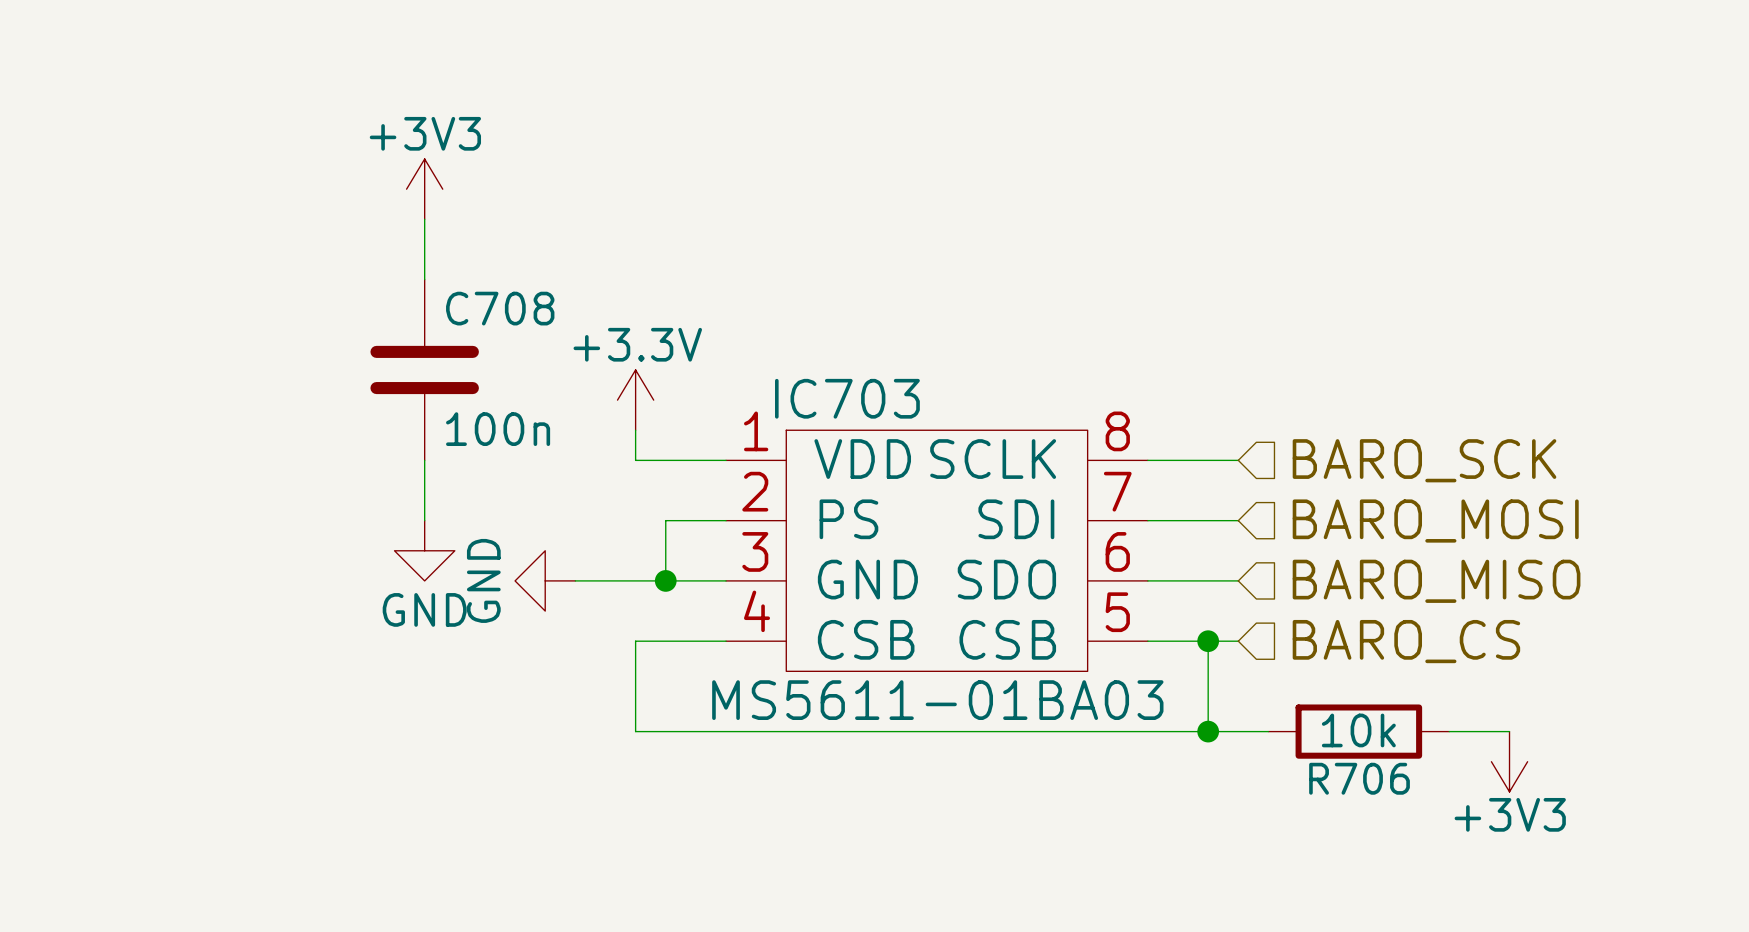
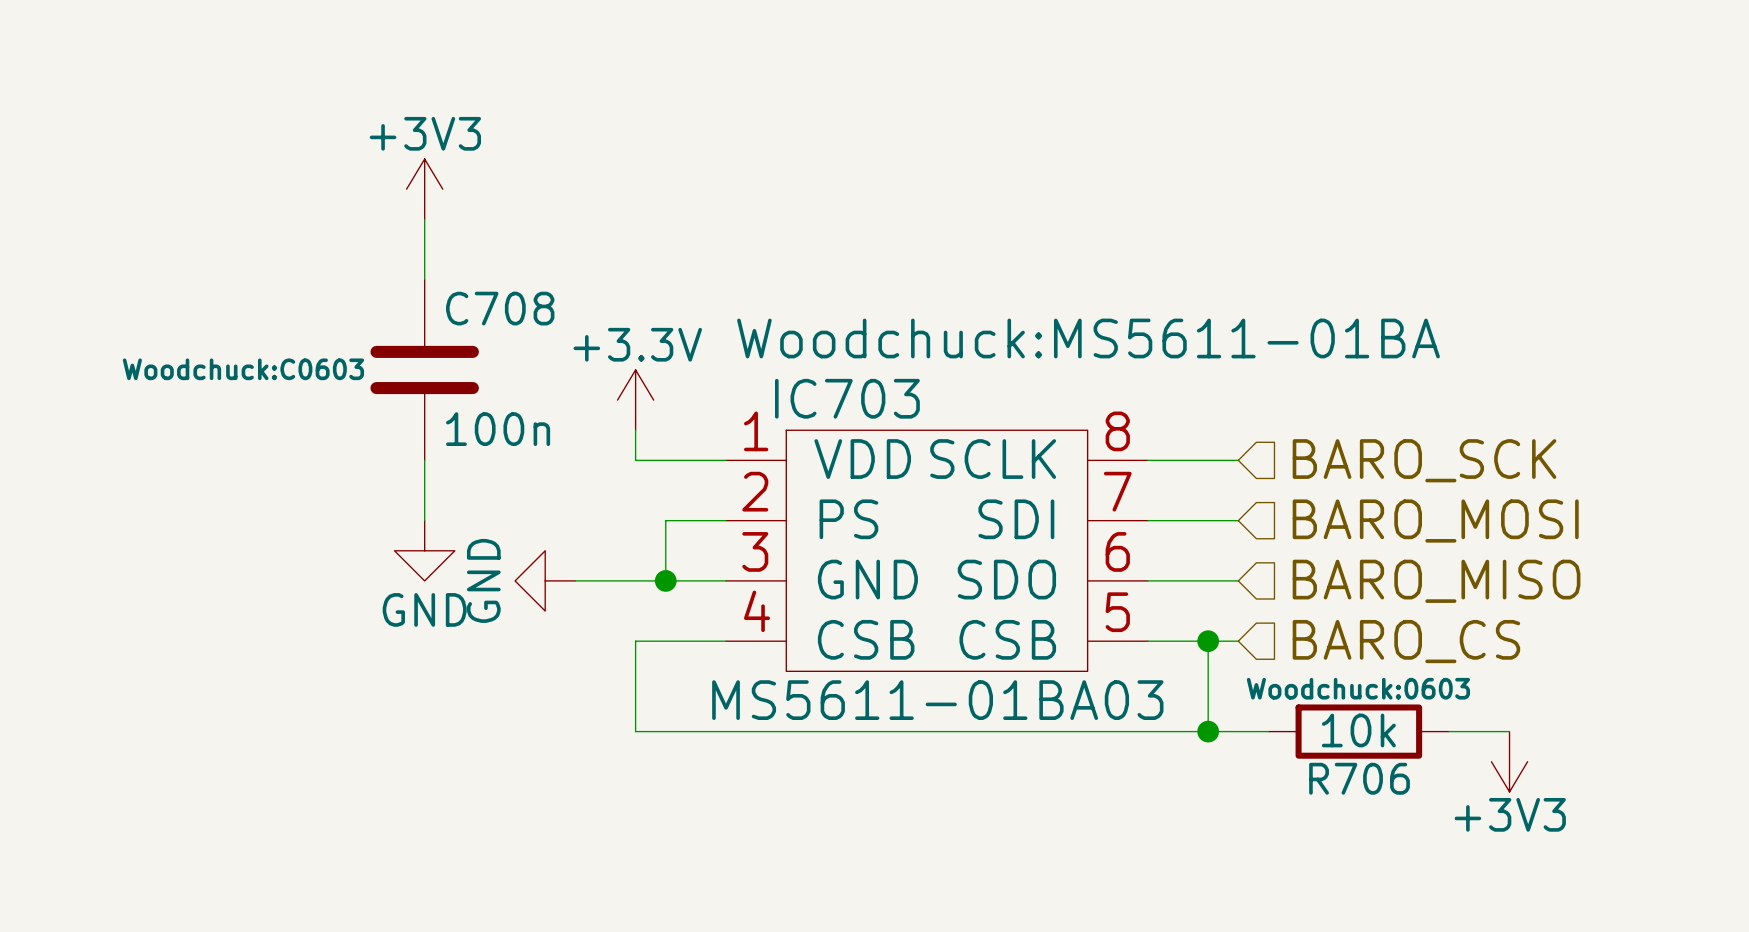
IC703 text: none -> Woodchuck:MS5611-01BA (1088, 338)
C708 text: none -> Woodchuck:C0603 (243, 369)
R706 text: none -> Woodchuck:0603 (1358, 688)

